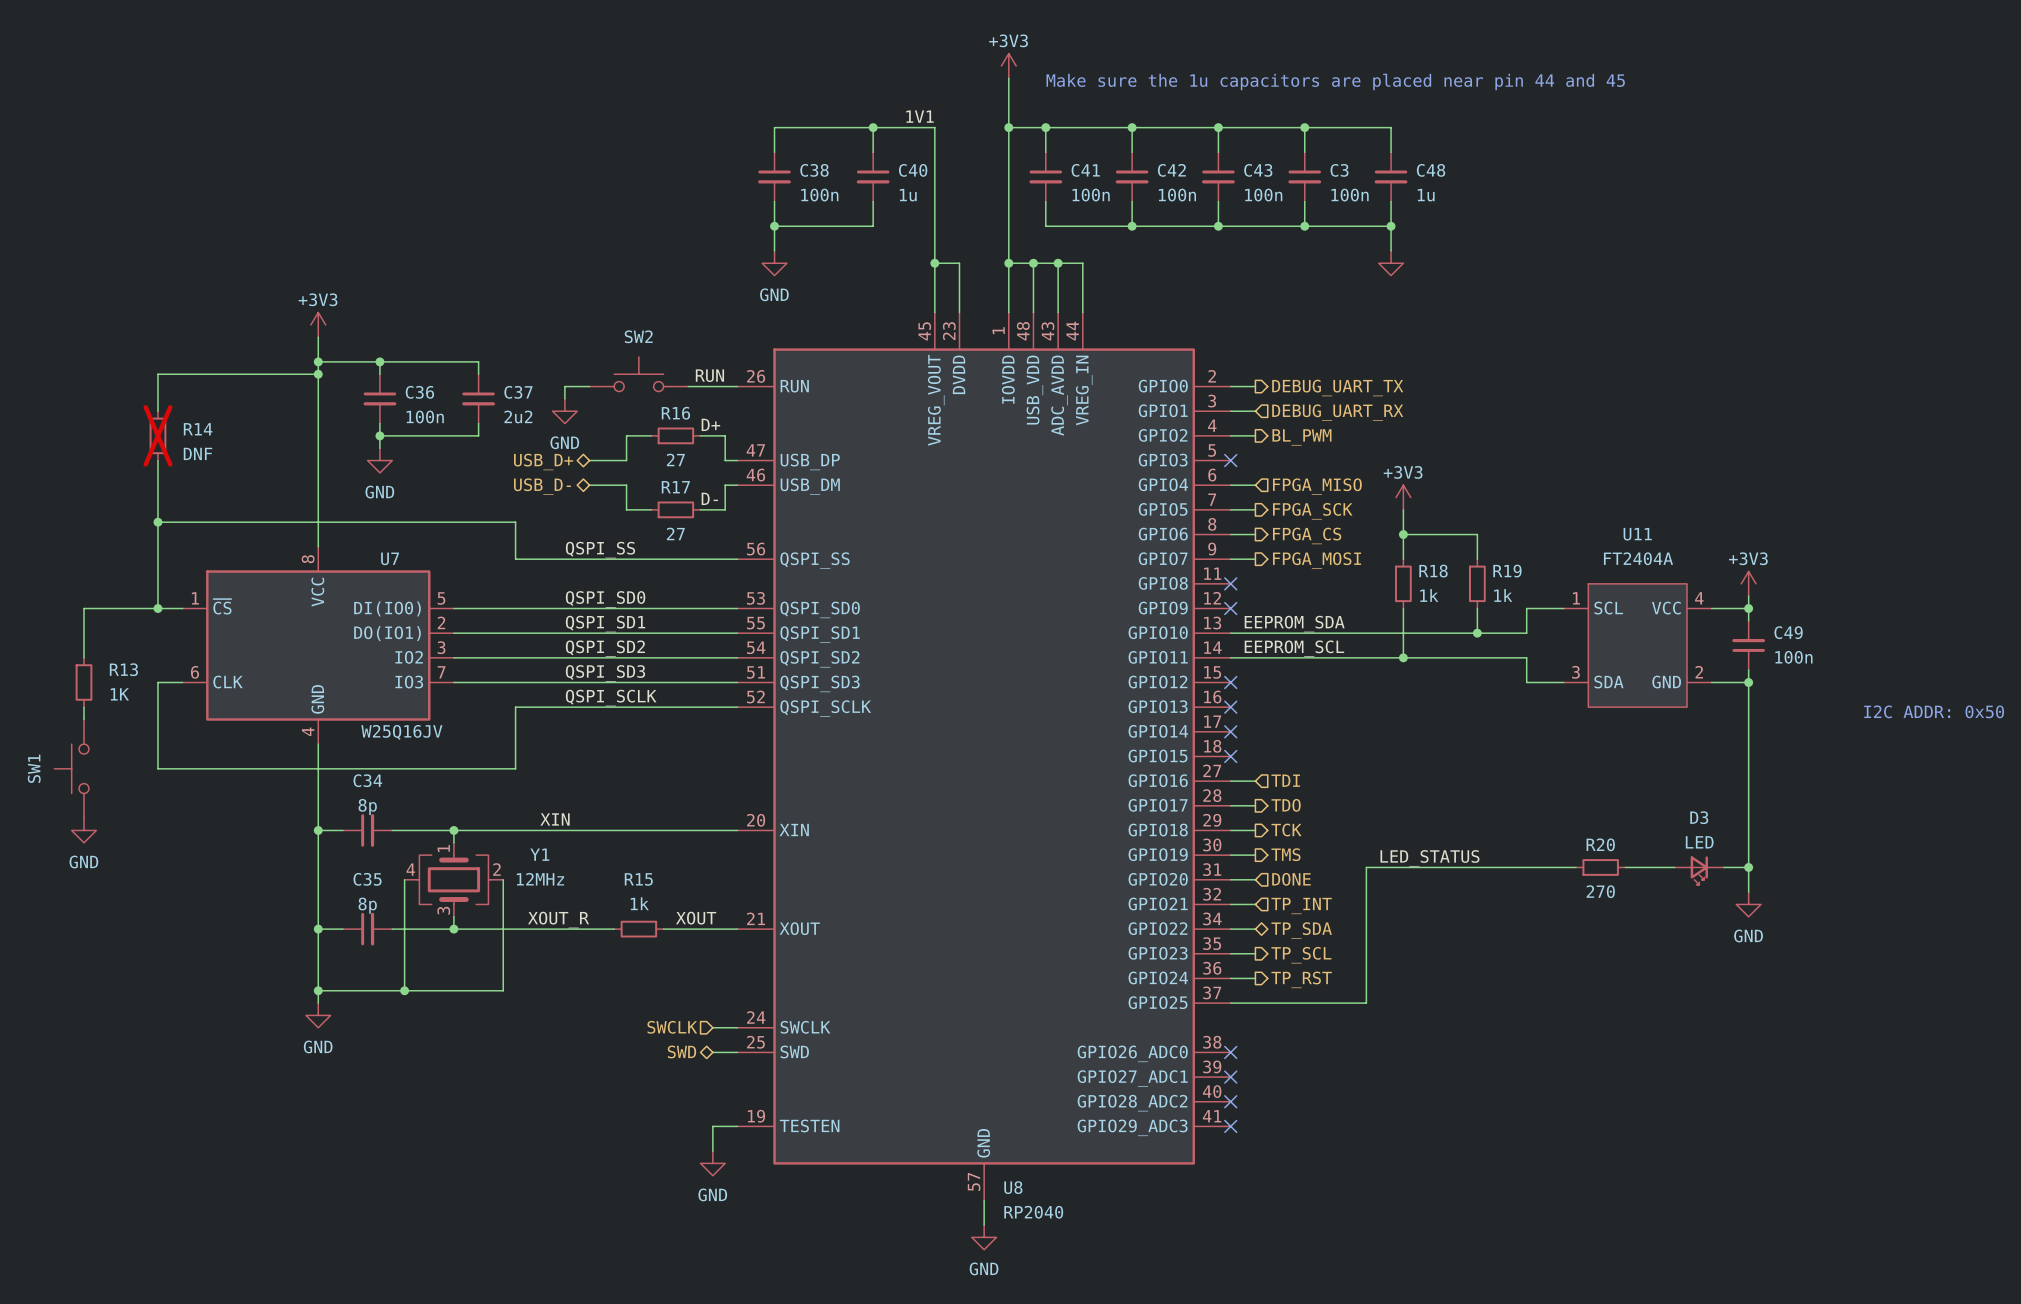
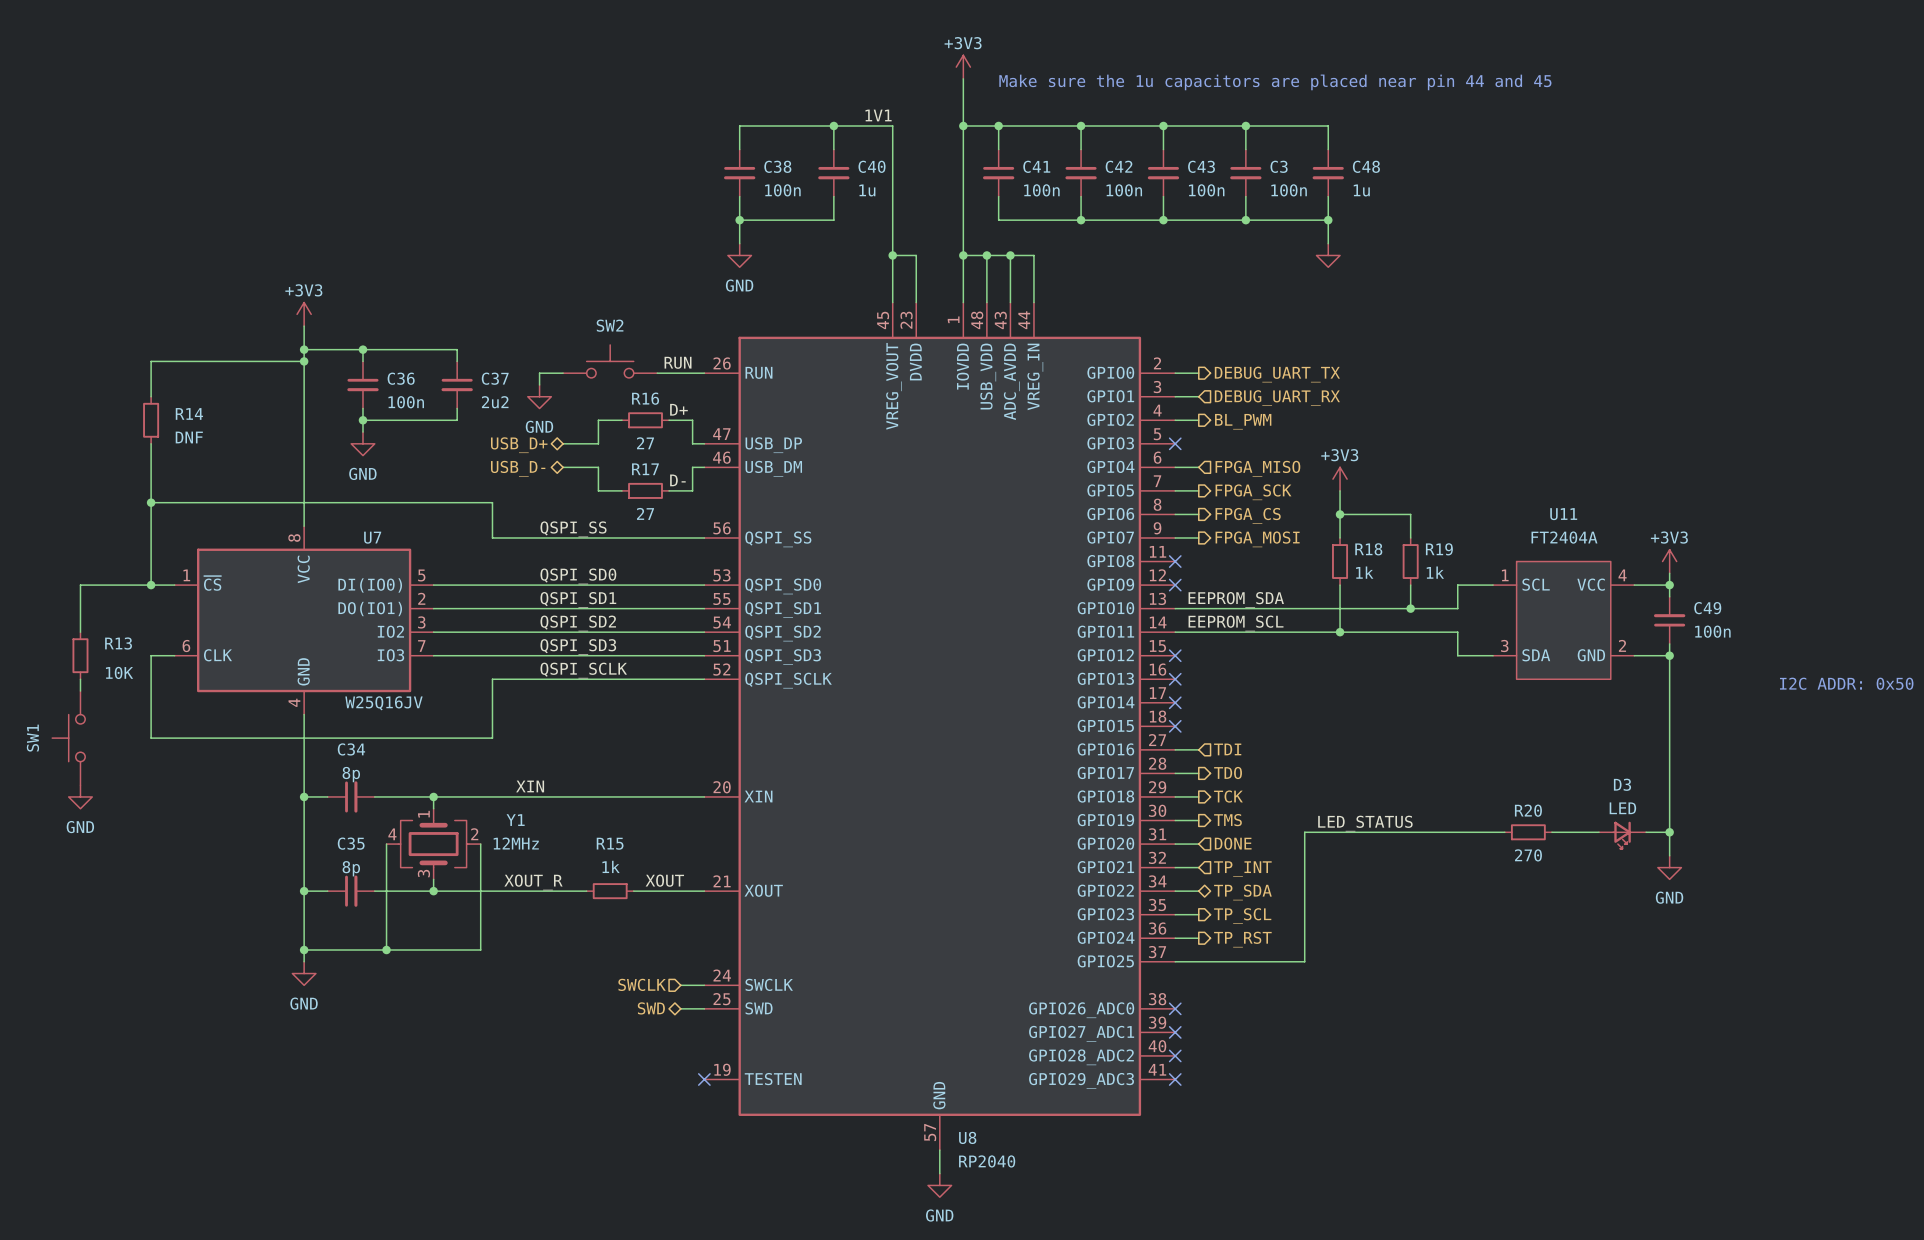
R14 do-not-place cross: (157, 435) -> none
R13 value: 1K (119, 694) -> 10K (119, 672)
wire: (737, 1126) (712, 1126) (712, 1151) -> none
no-connect mark: none -> (704, 1079)
power symbol: GND (712, 1163) -> none

